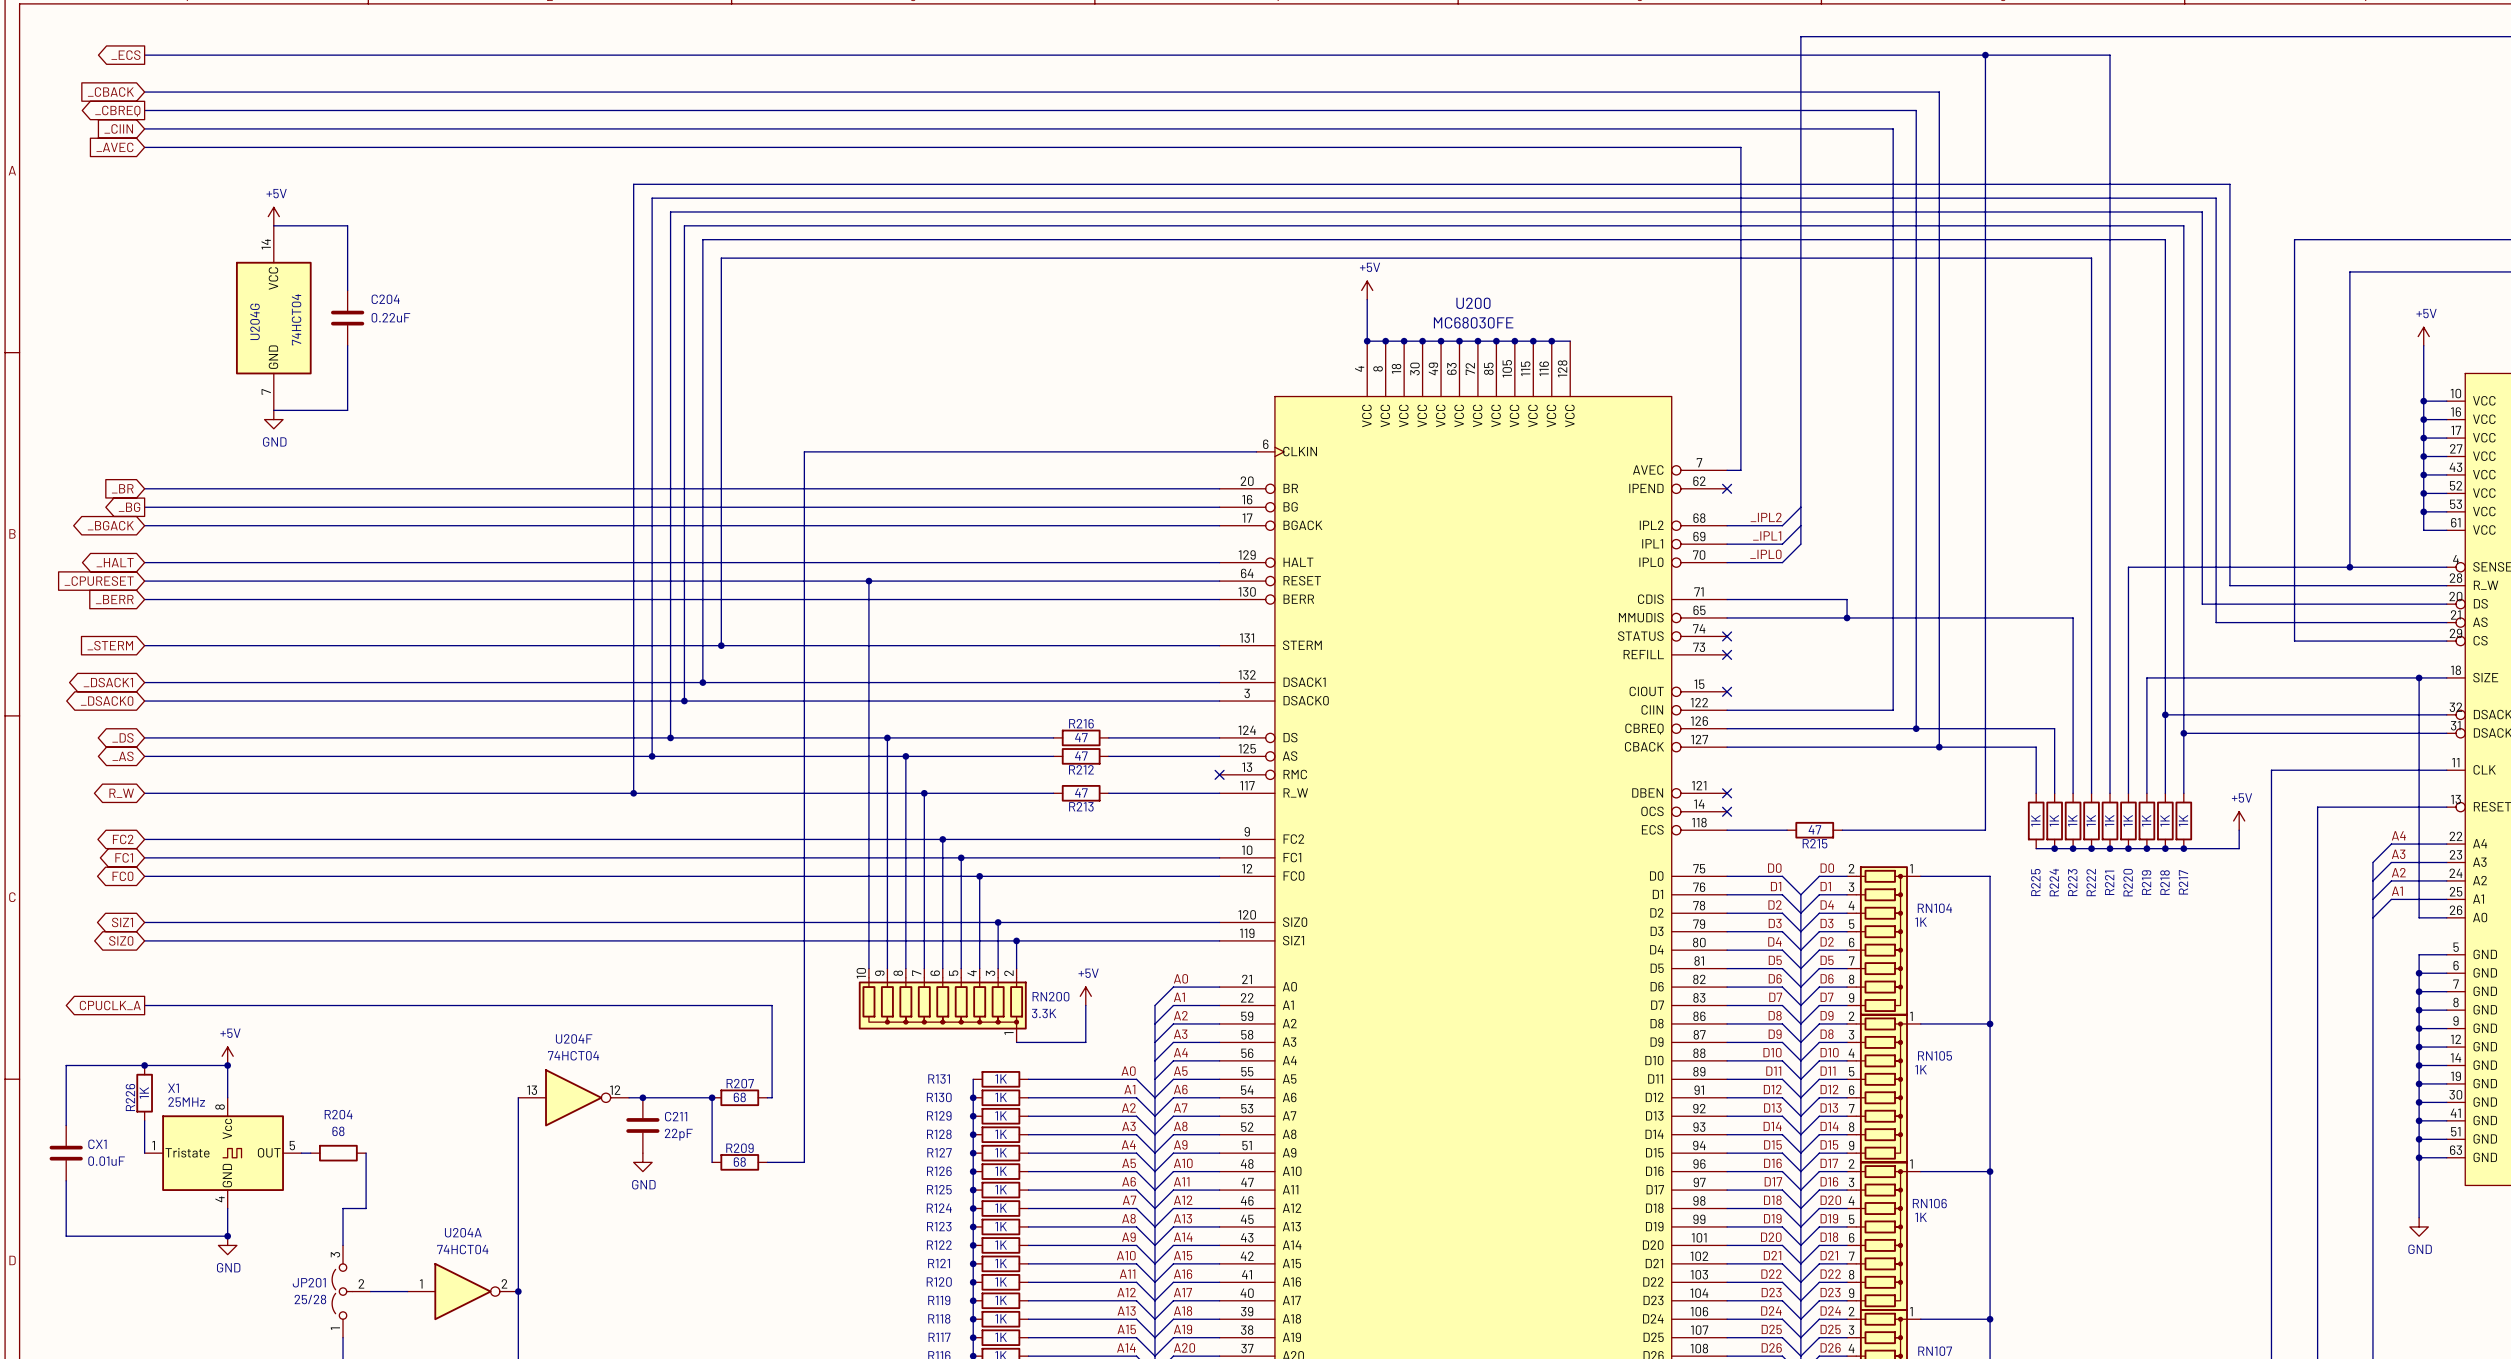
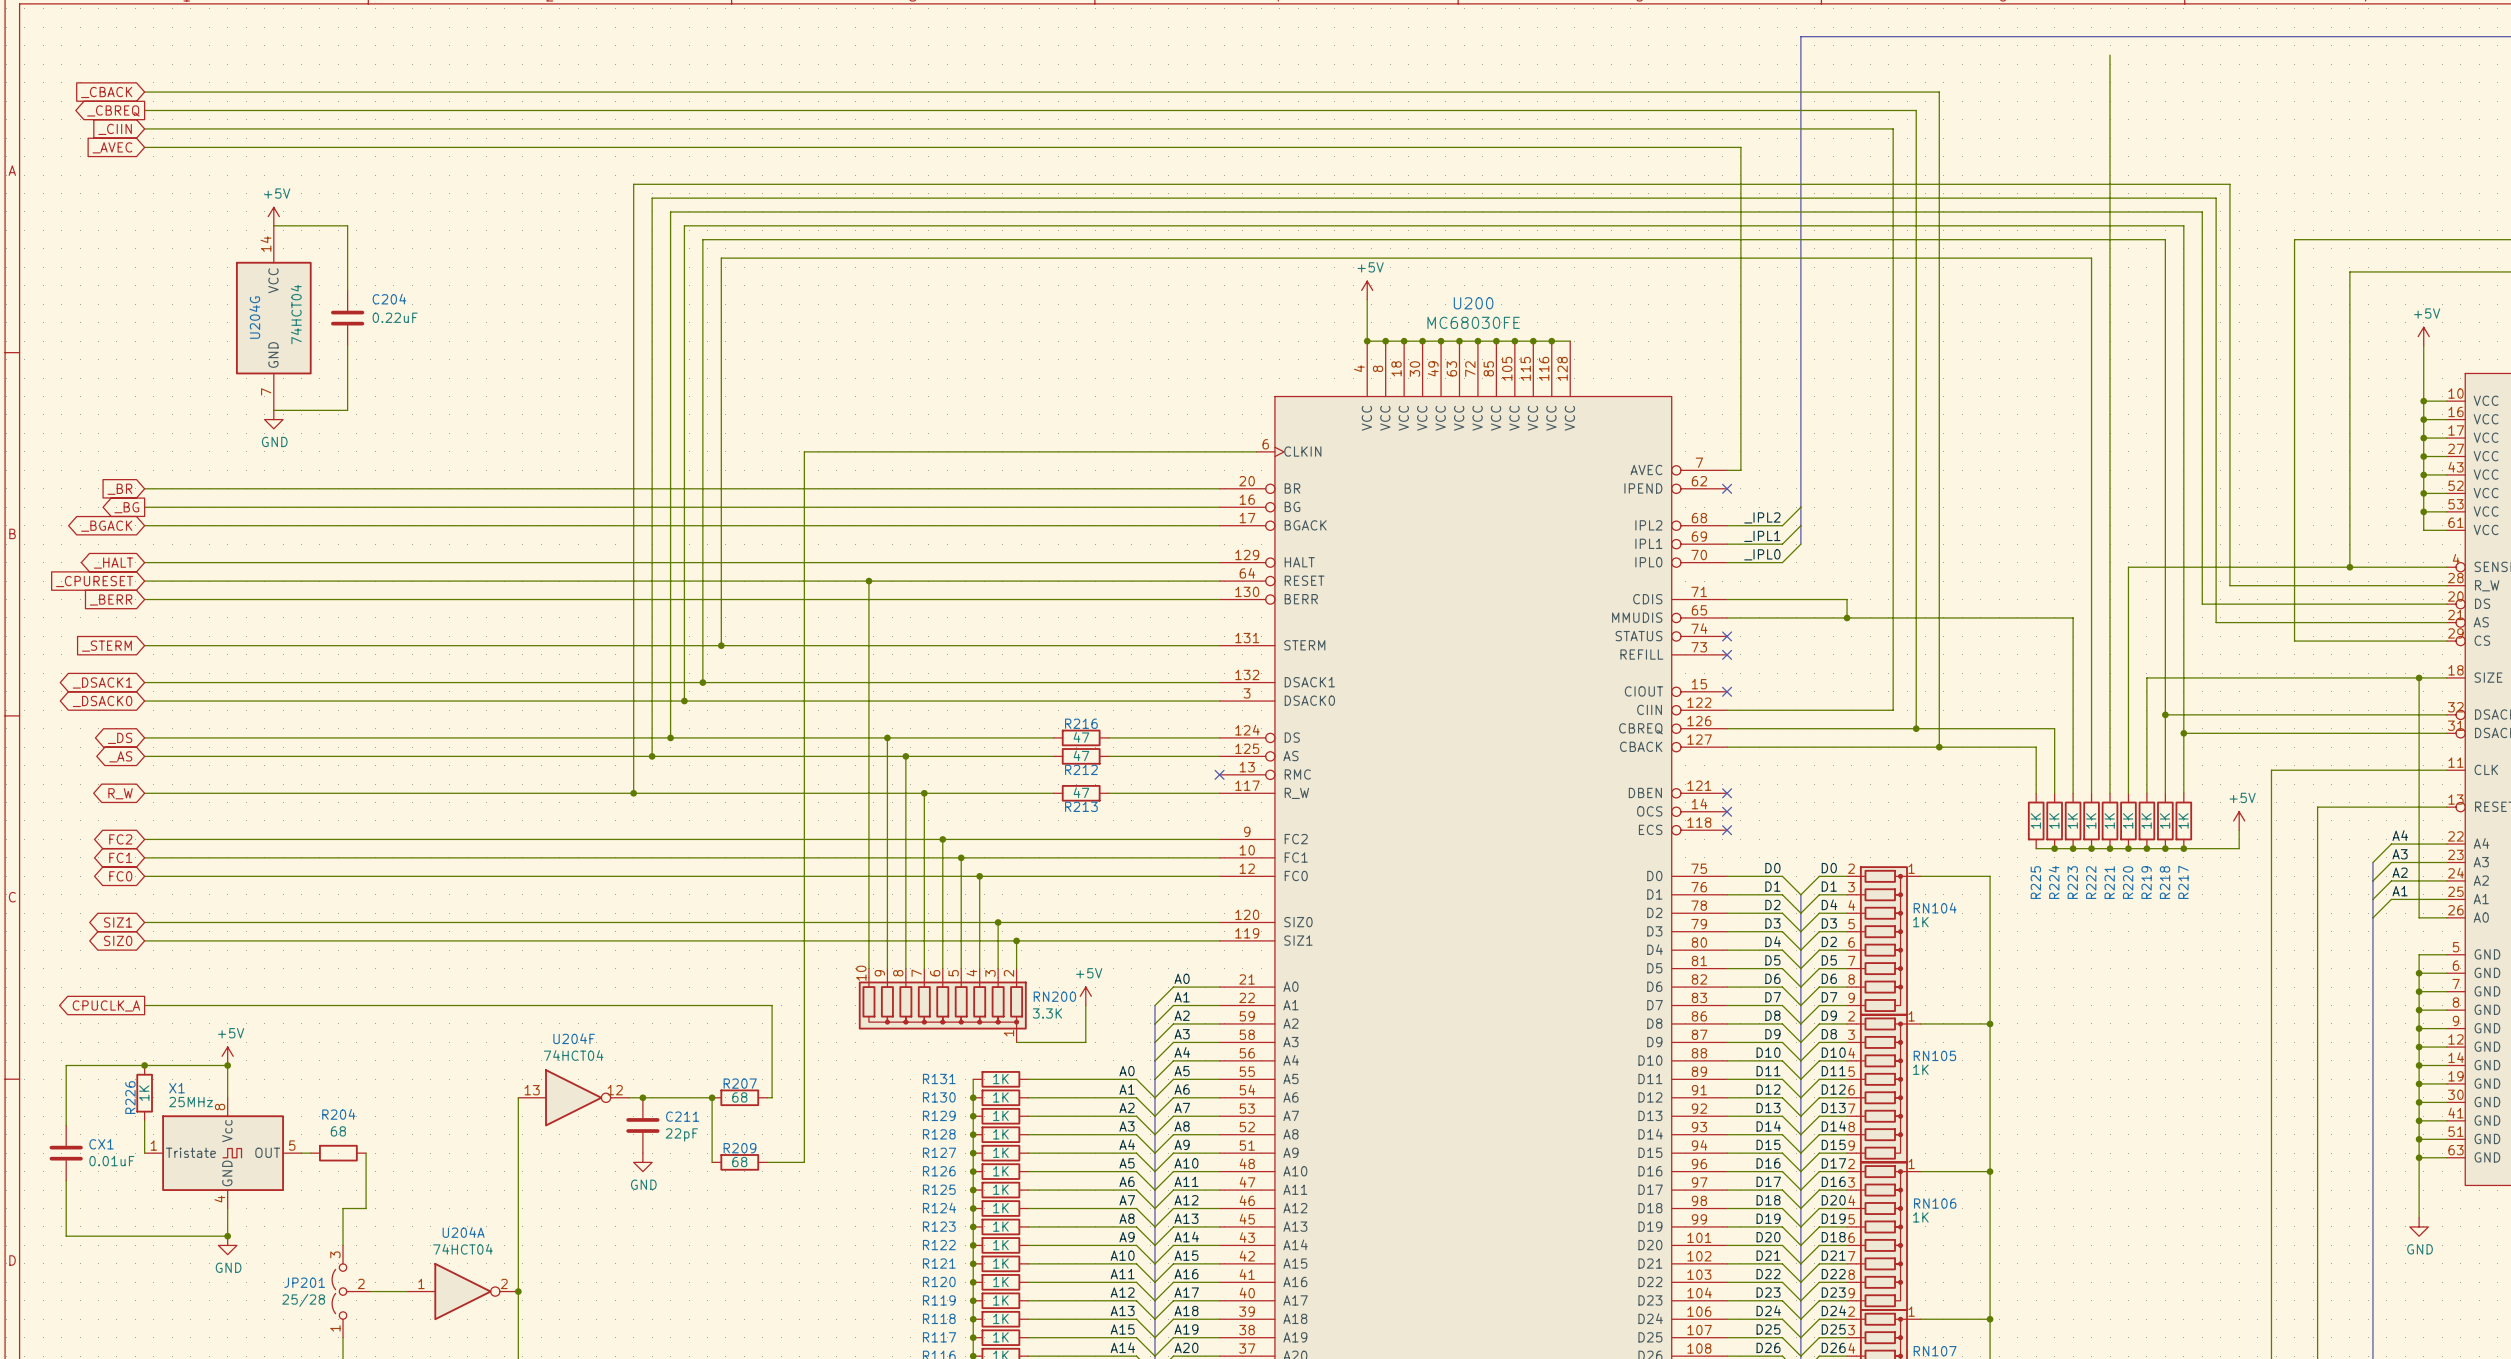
global label: _ECS (125, 55) -> none
wire: (144, 55) (2110, 55) -> none
wire: (1985, 55) (1985, 830) (1842, 830) -> none
junction: (1985, 55) -> none
wire: (1727, 830) (1787, 830) -> none
no-connect mark: none -> (1727, 830)
R215: 47 (1814, 830) -> none

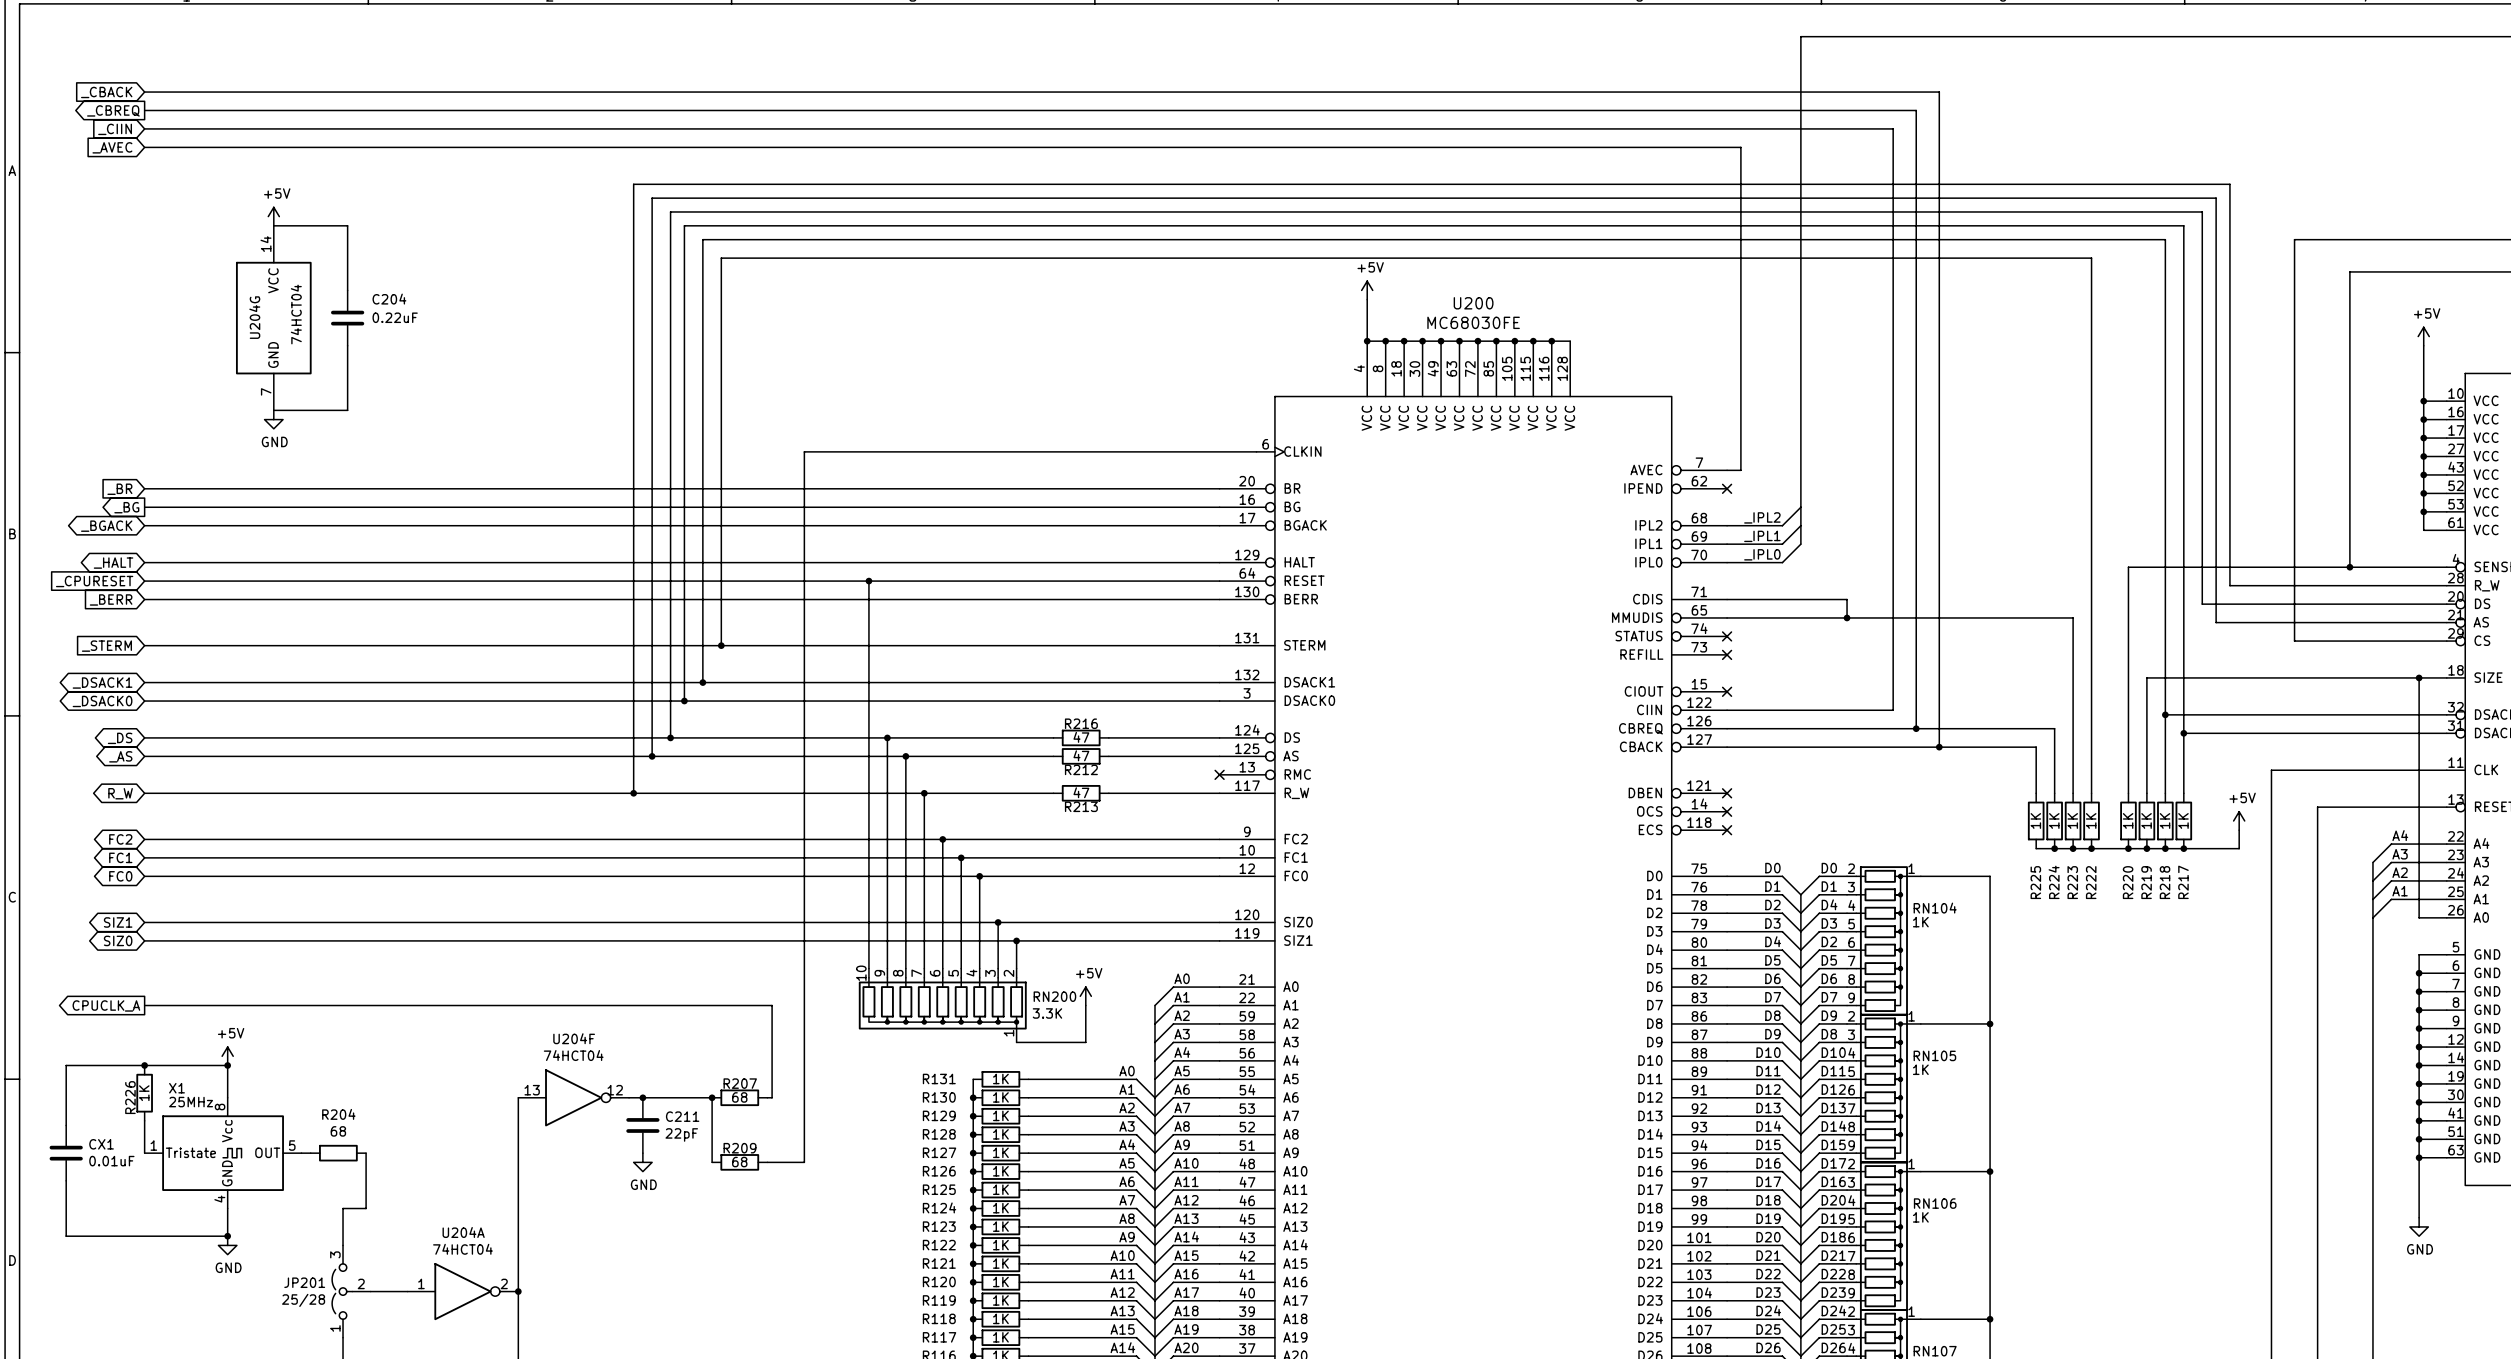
wire: (2110, 55) (2110, 793) -> none
R221: 1K (2110, 820) -> none
junction: (2110, 848) -> none

